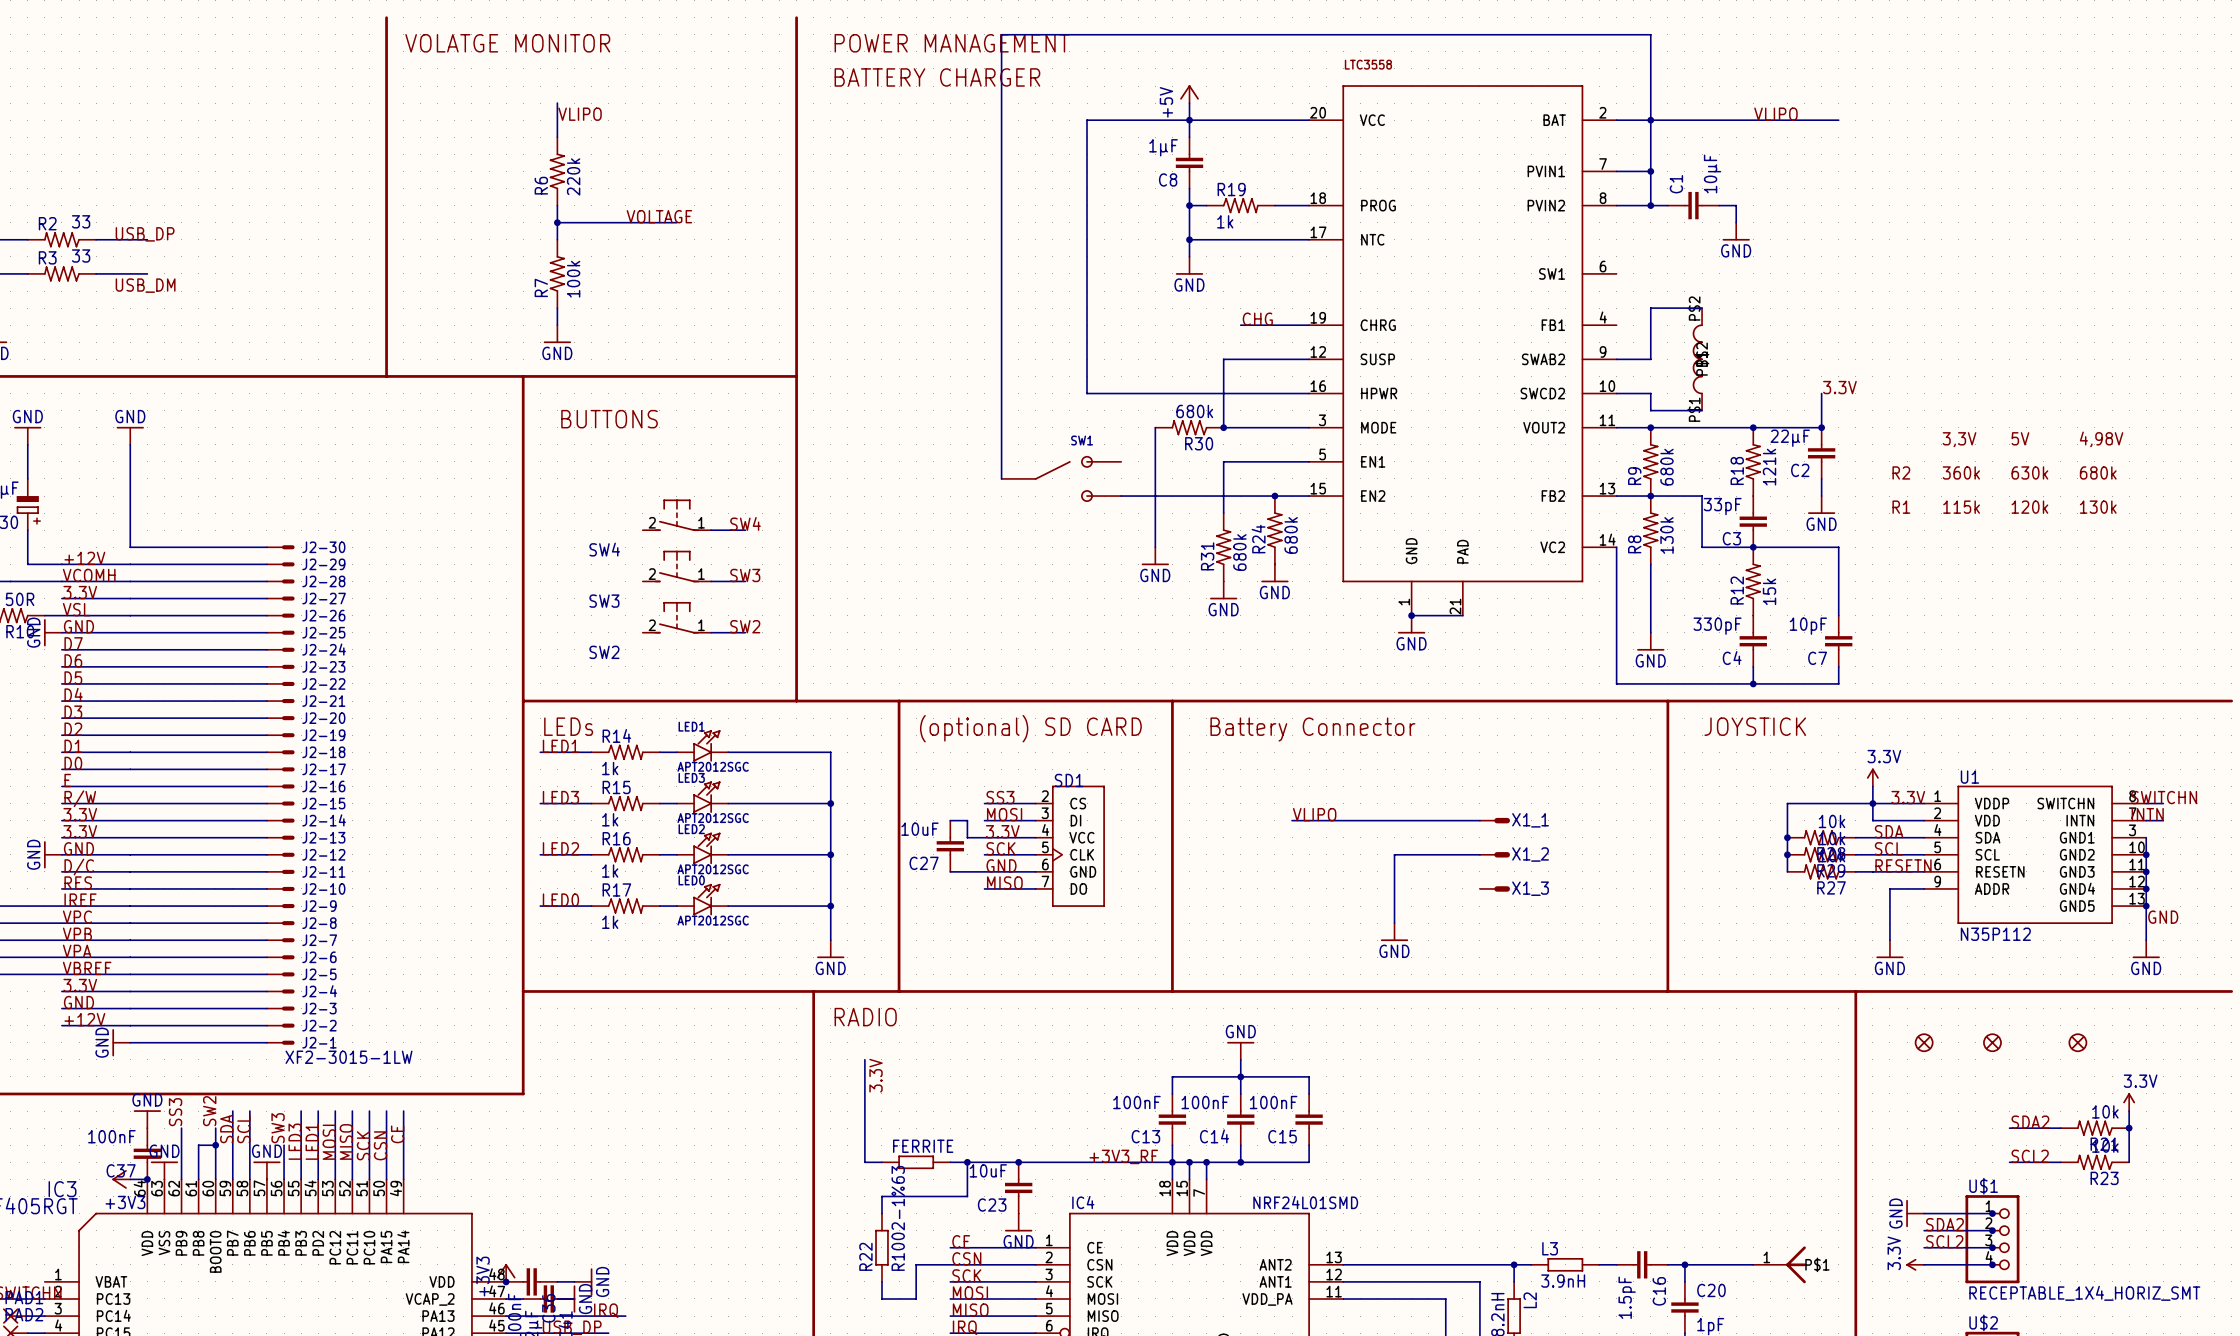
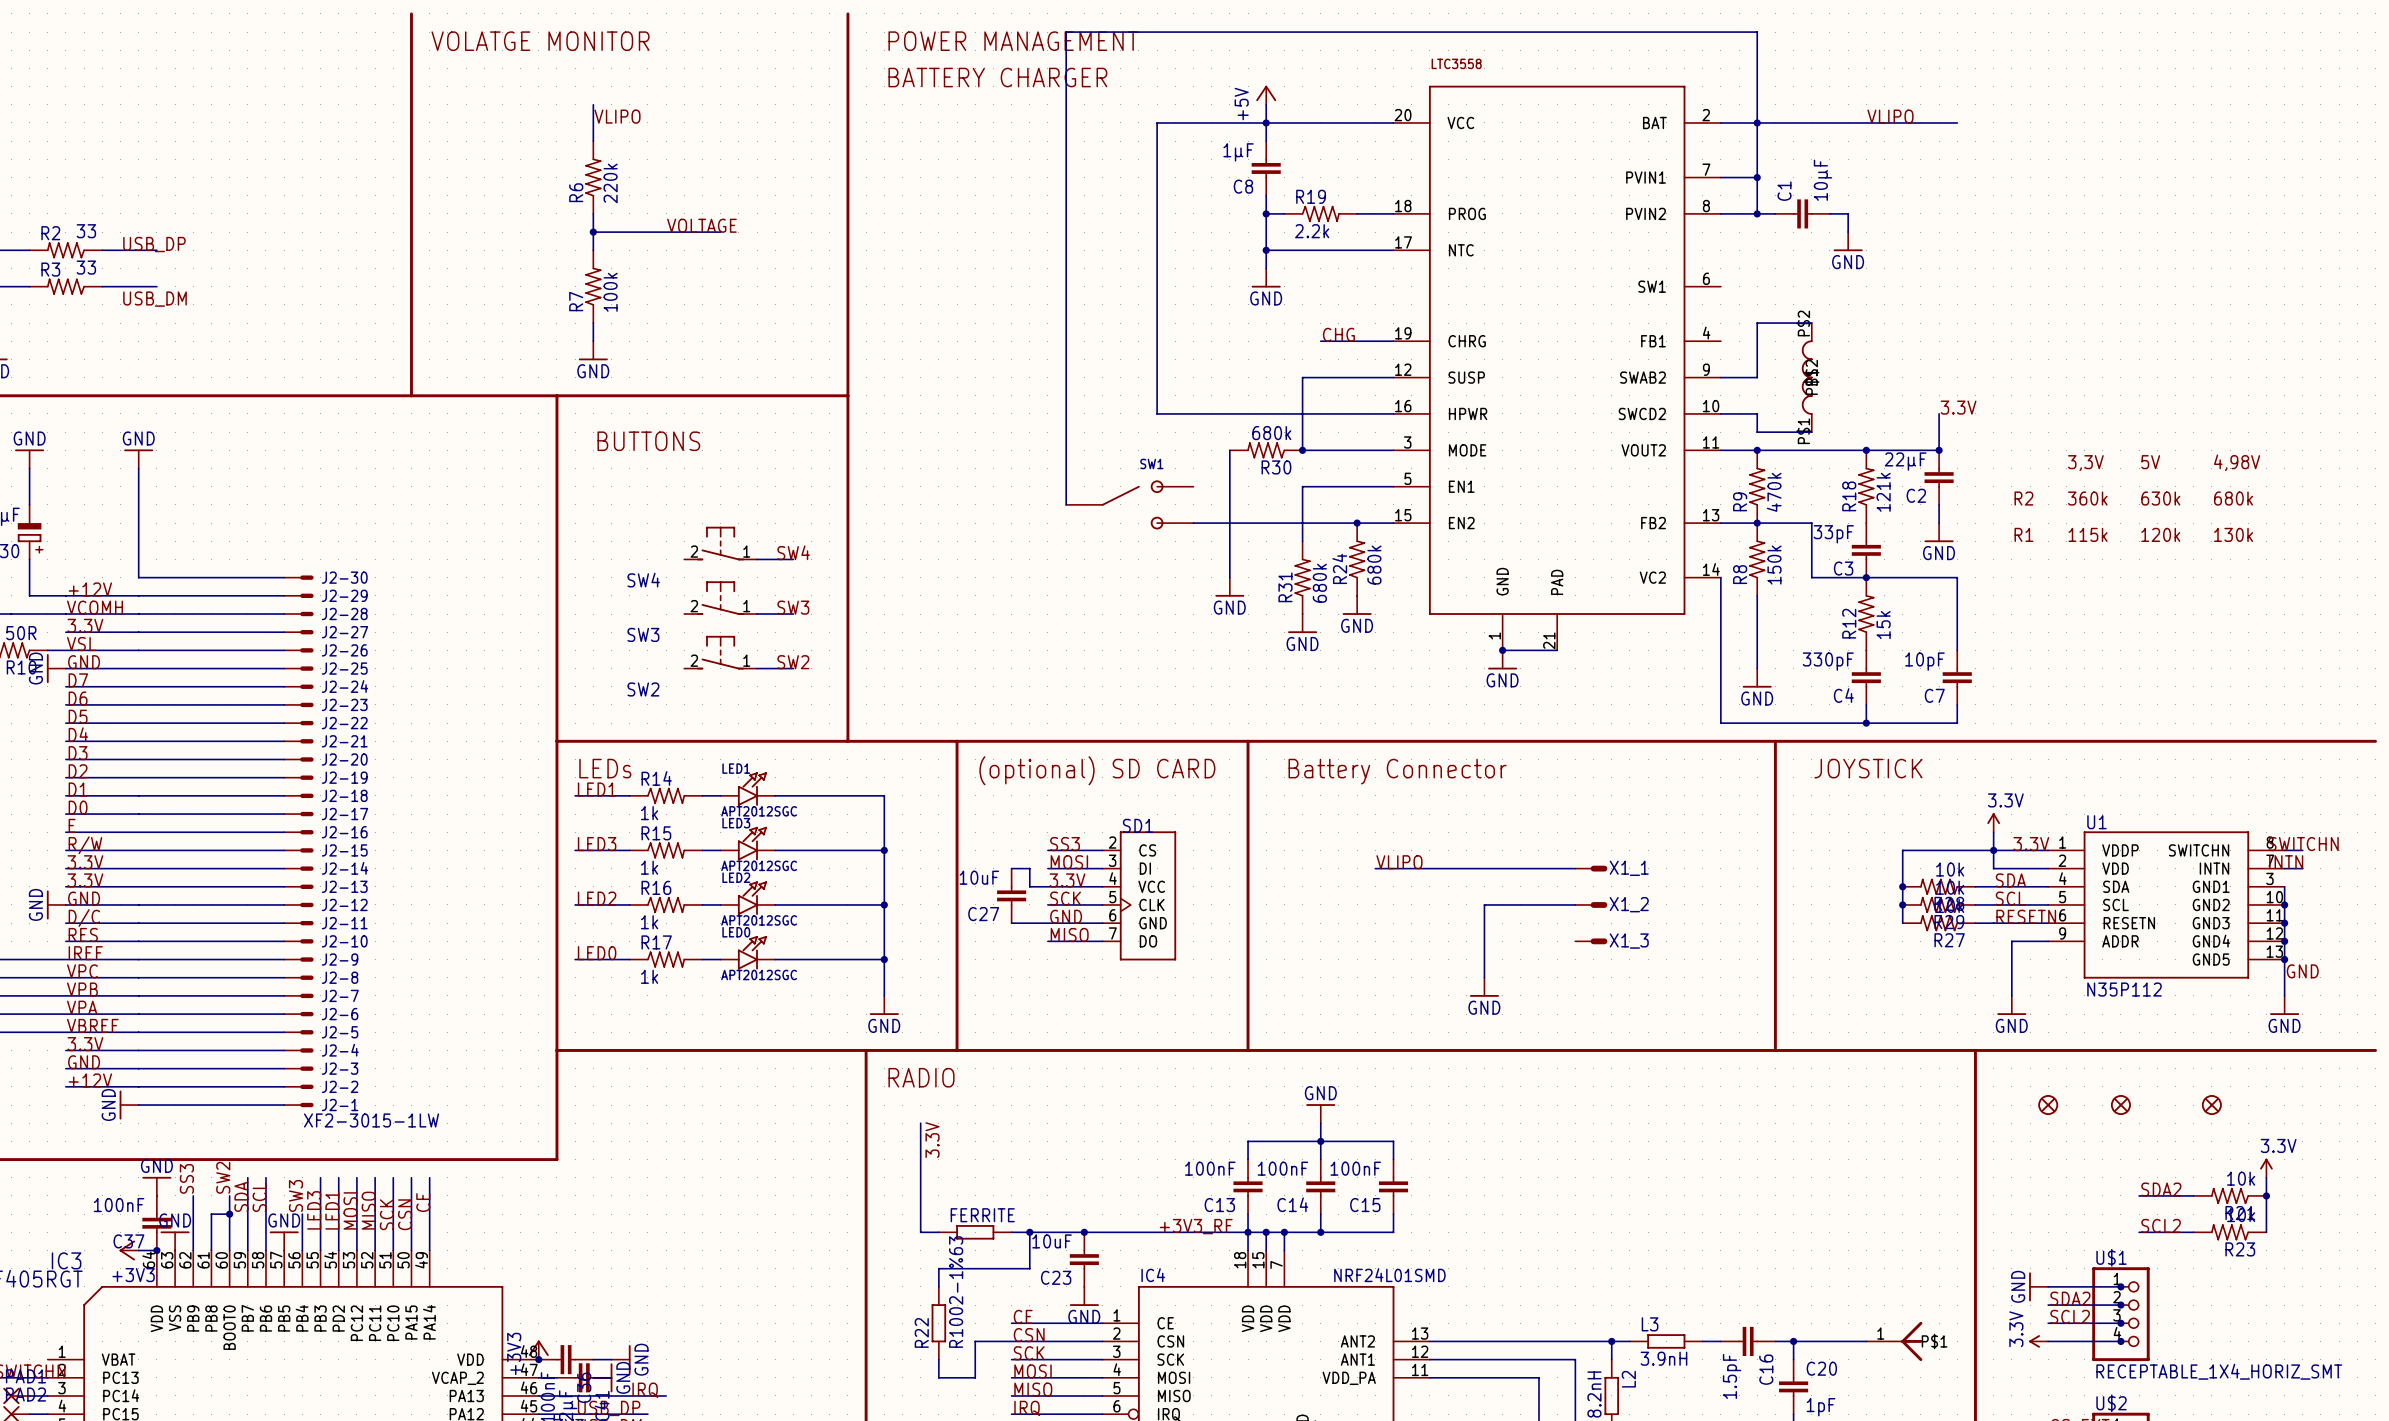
R19 value: 1k (1225, 221) -> 2.2k (1312, 231)
R9 value: 680k (1667, 467) -> 470k (1774, 492)
R8 value: 130k (1667, 535) -> 150k (1774, 565)

